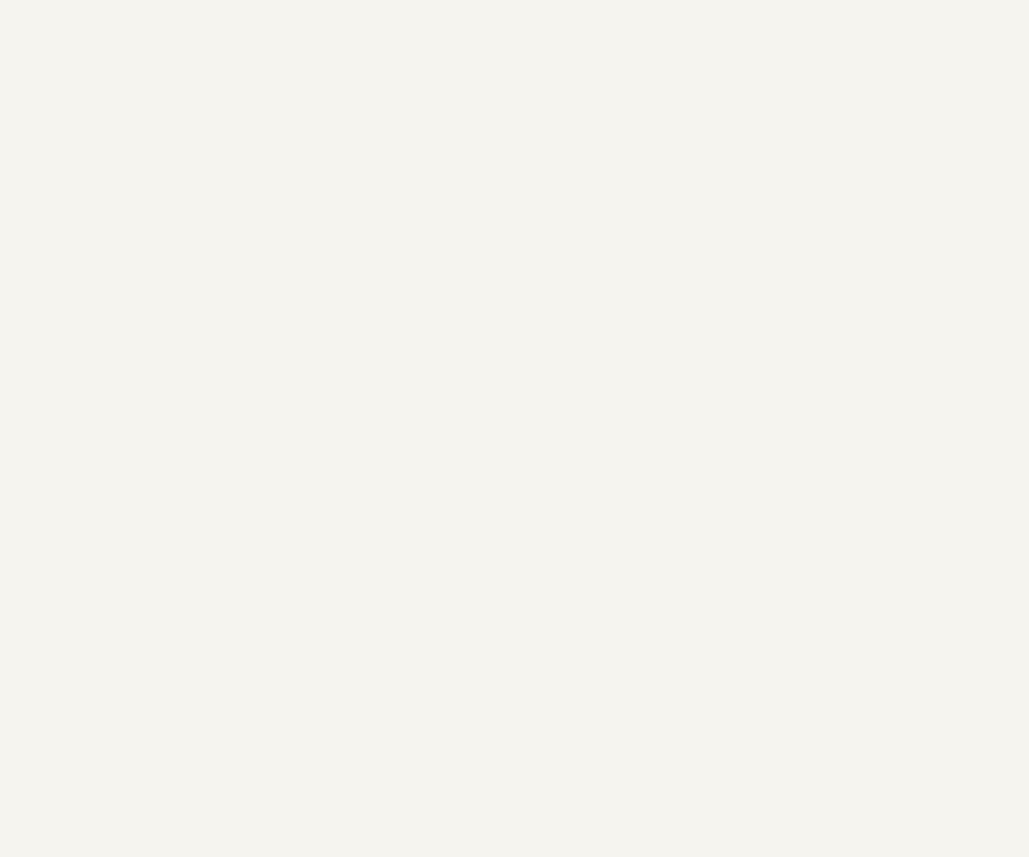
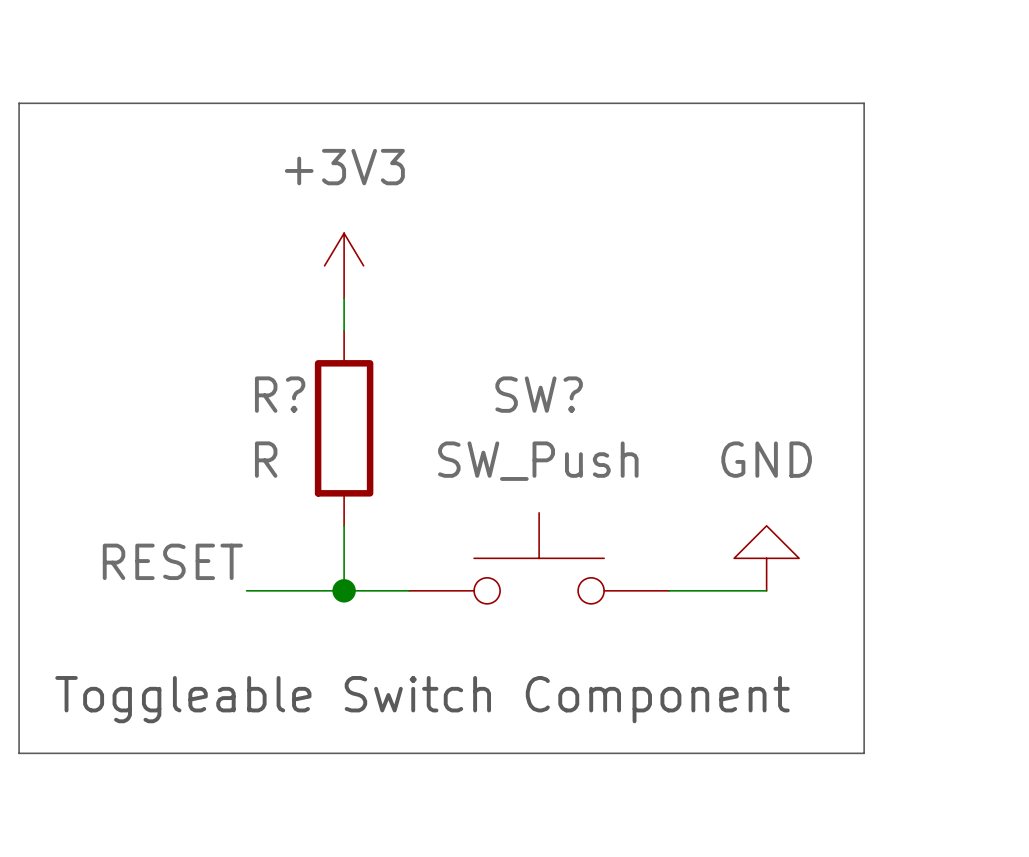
line: none -> (19, 103) (864, 103) (864, 753) (19, 753) (19, 103)
power symbol: none -> +3V3 (344, 265)
wire: none -> (344, 298) (344, 330)
R?: none -> R (344, 428)
wire: none -> (344, 525) (344, 590)
SW?: none -> SW_Push (539, 558)
power symbol: none -> GND (766, 558)
label: none -> RESET (172, 561)
wire: none -> (246, 590) (409, 590)
junction: none -> (344, 590)
wire: none -> (669, 590) (766, 590)
text: none -> Toggleable Switch Component (422, 699)

